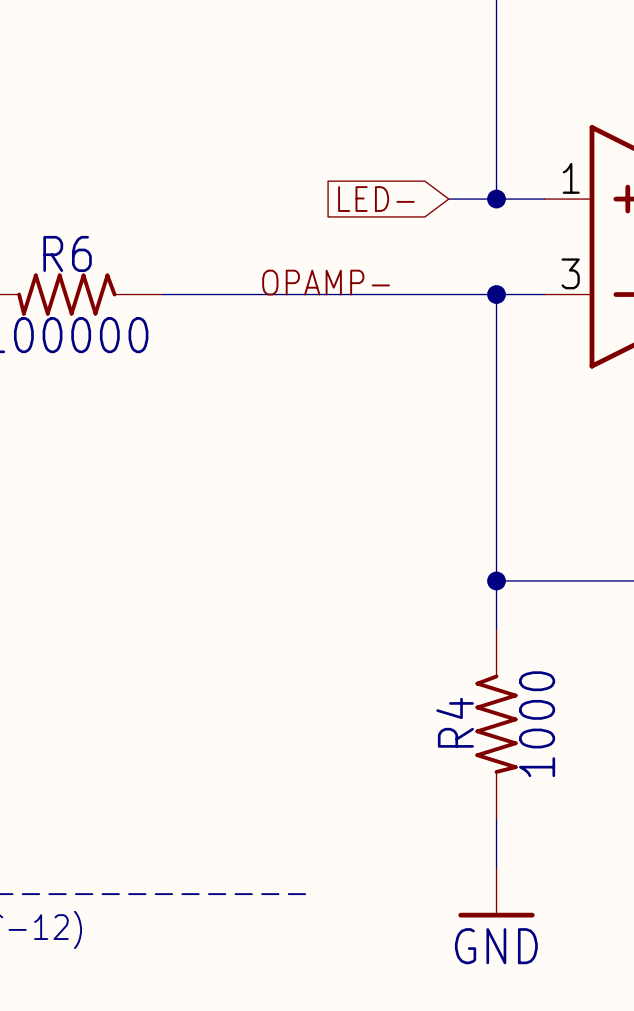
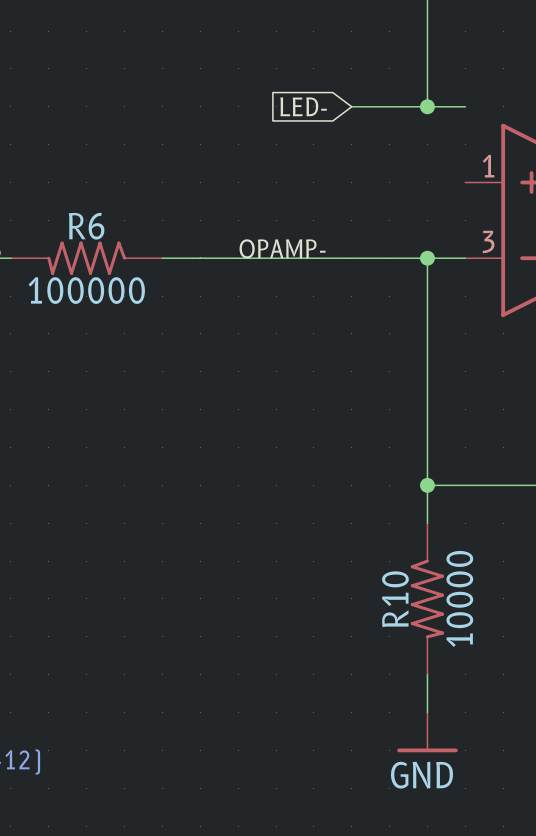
wire: none -> (351, 106) (465, 106)
wire: (496, 103) (496, 199) -> none
global label position: LED- (376, 199) -> LED- (303, 106)
wire: (448, 199) (544, 199) -> none
junction position: (496, 199) -> (427, 106)
R4 name: R4 (455, 722) -> R10 (395, 599)
R4 value: 1000 (537, 724) -> 10000 (459, 598)

